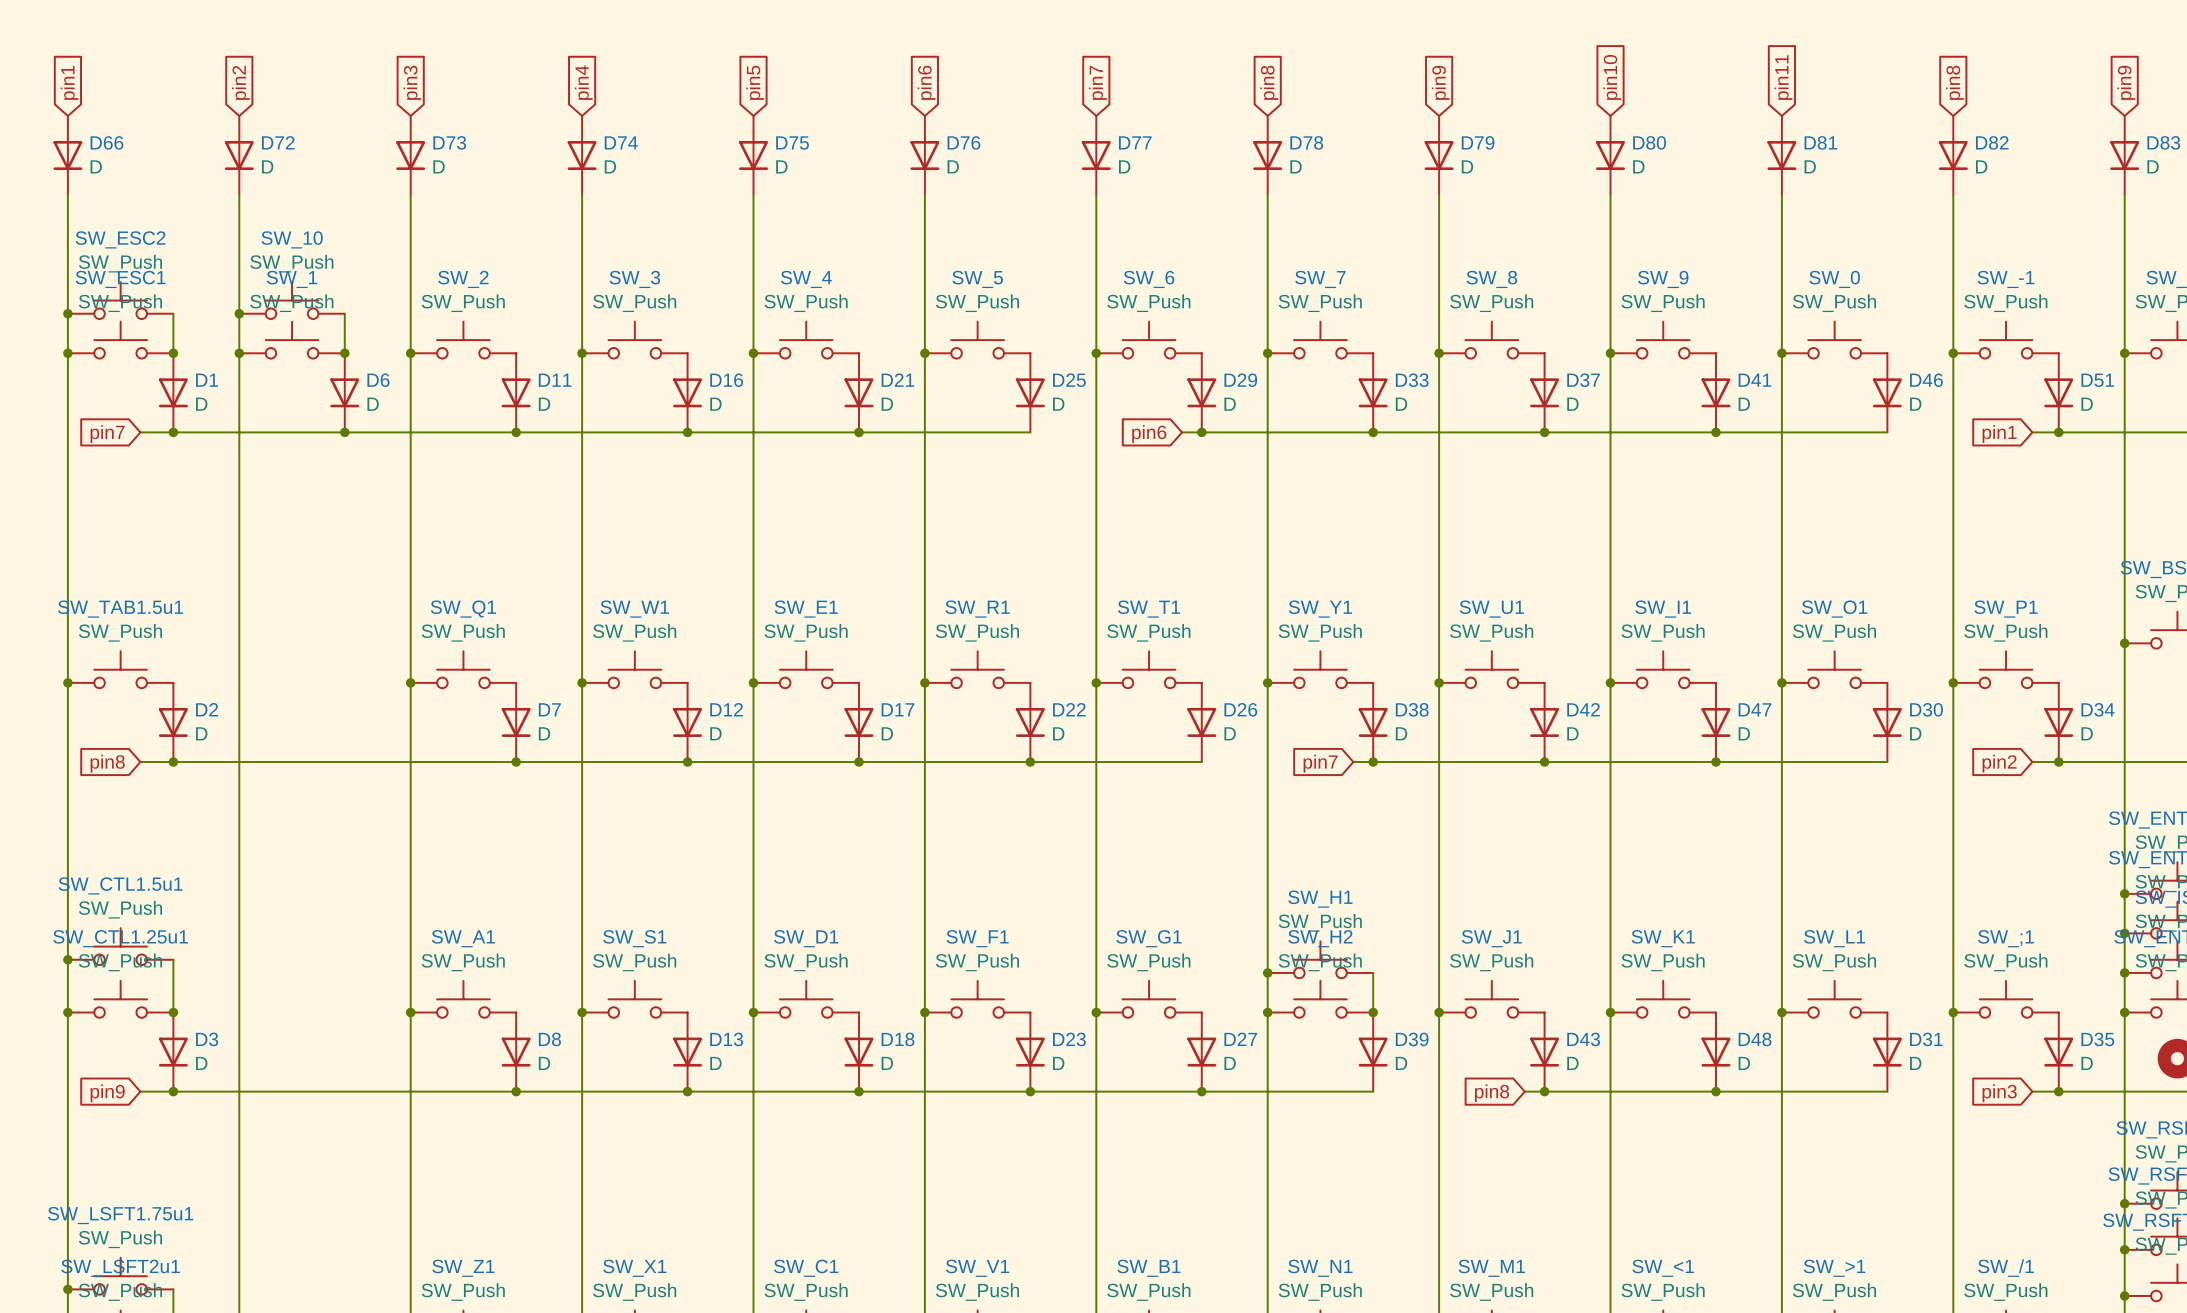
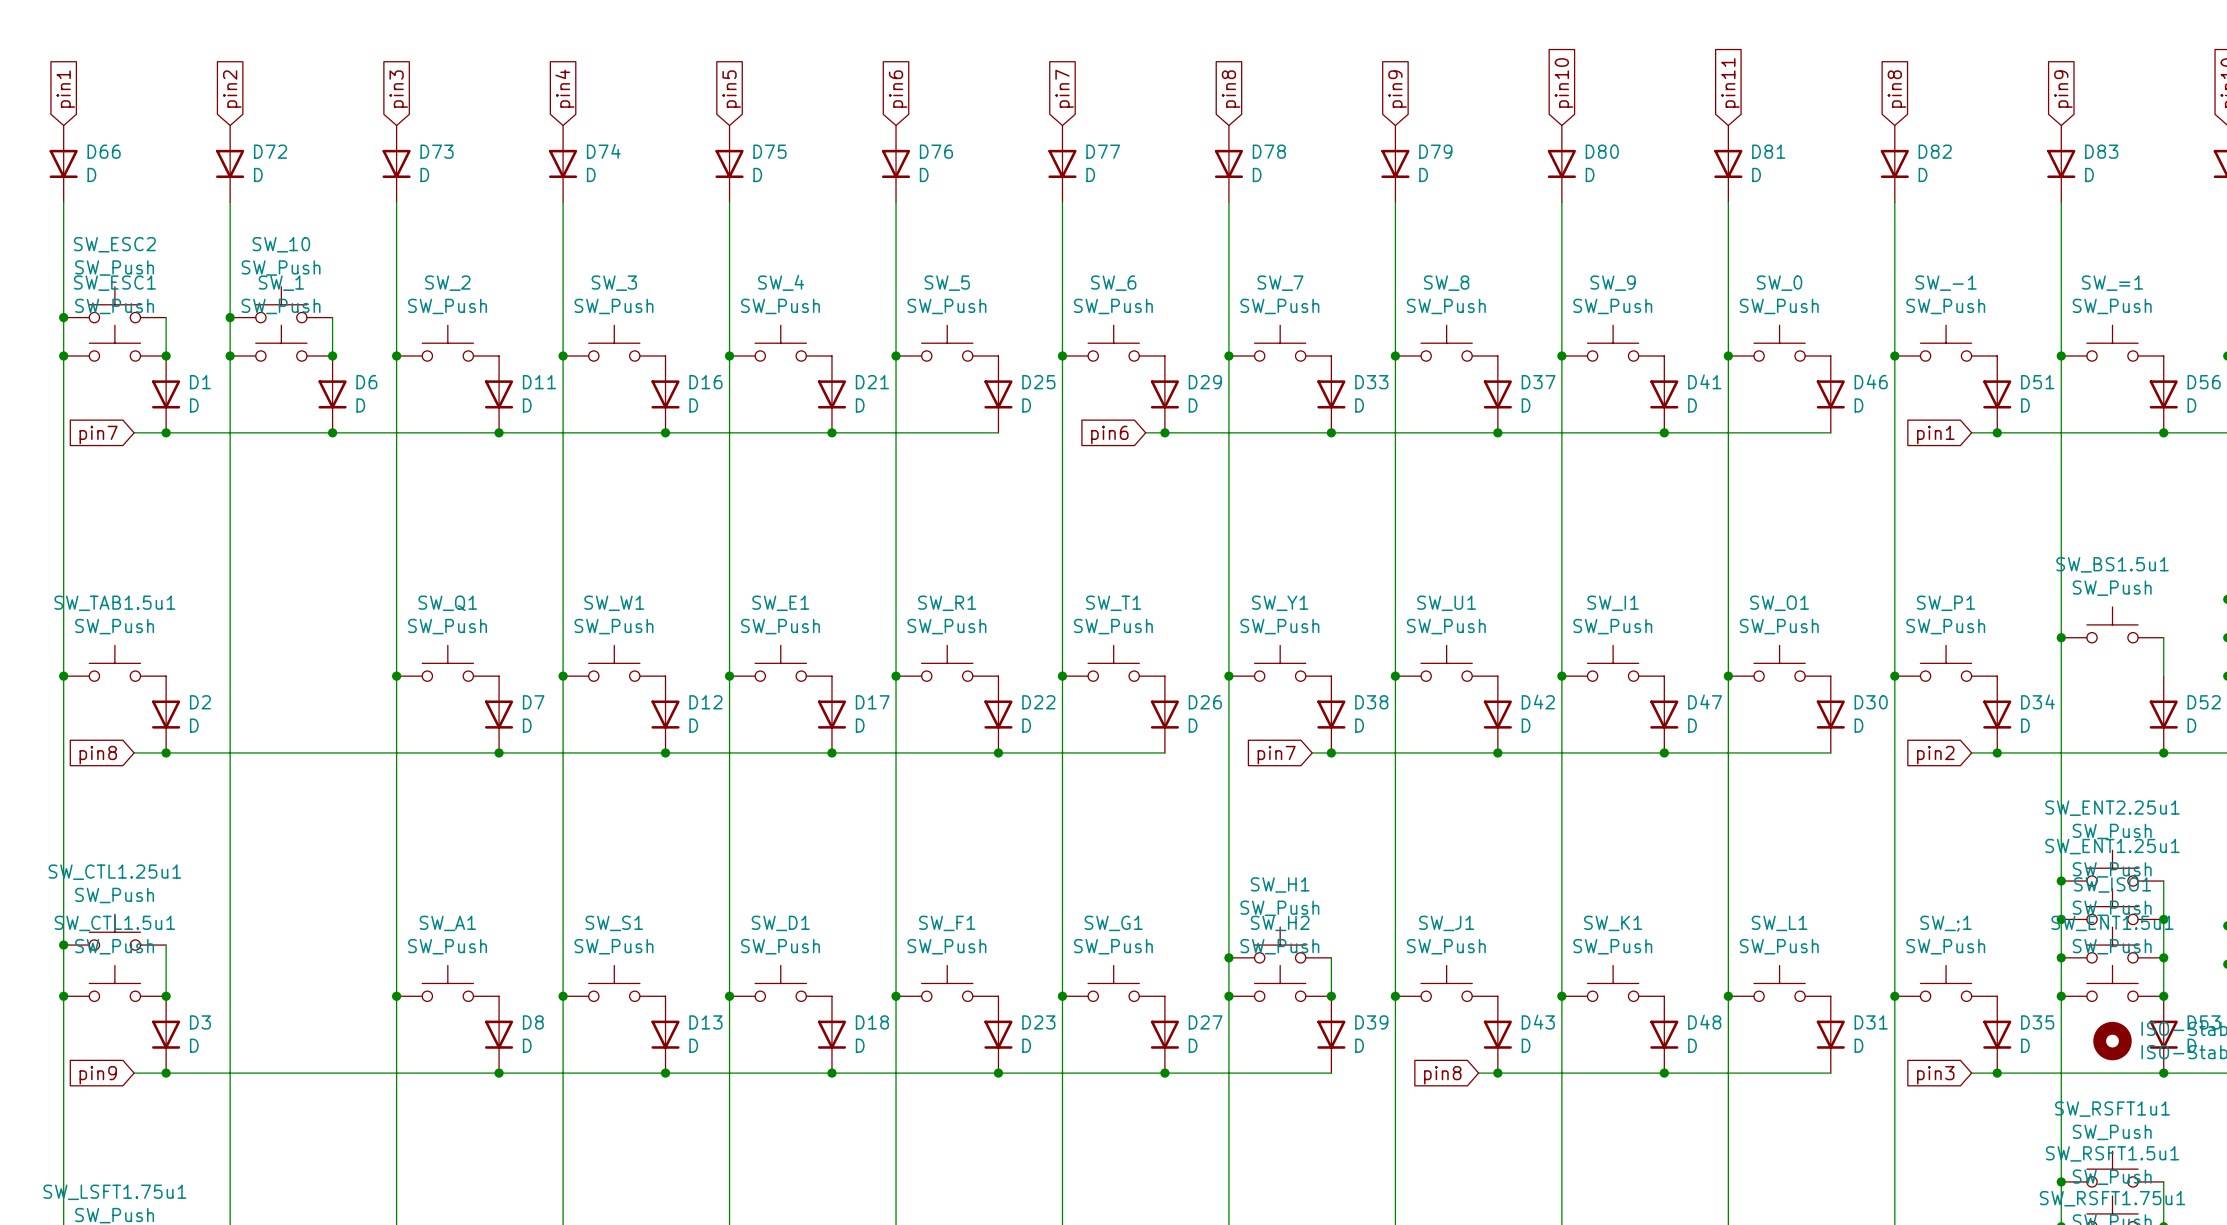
SW_CTL1.5u1 name: SW_CTL1.5u1 (120, 885) -> SW_CTL1.25u1 (114, 872)
SW_CTL1.25u1 name: SW_CTL1.25u1 (120, 938) -> SW_CTL1.5u1 (114, 923)

